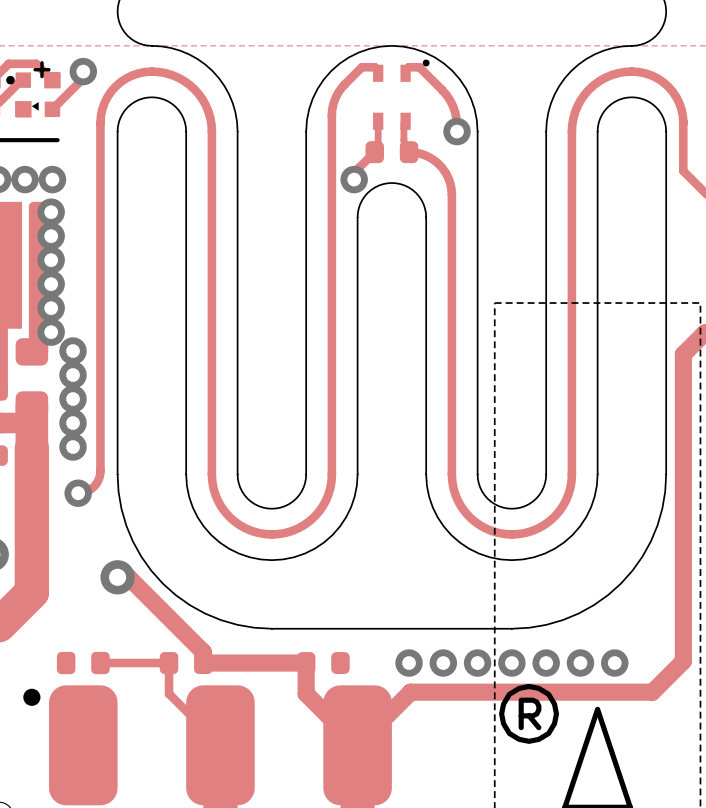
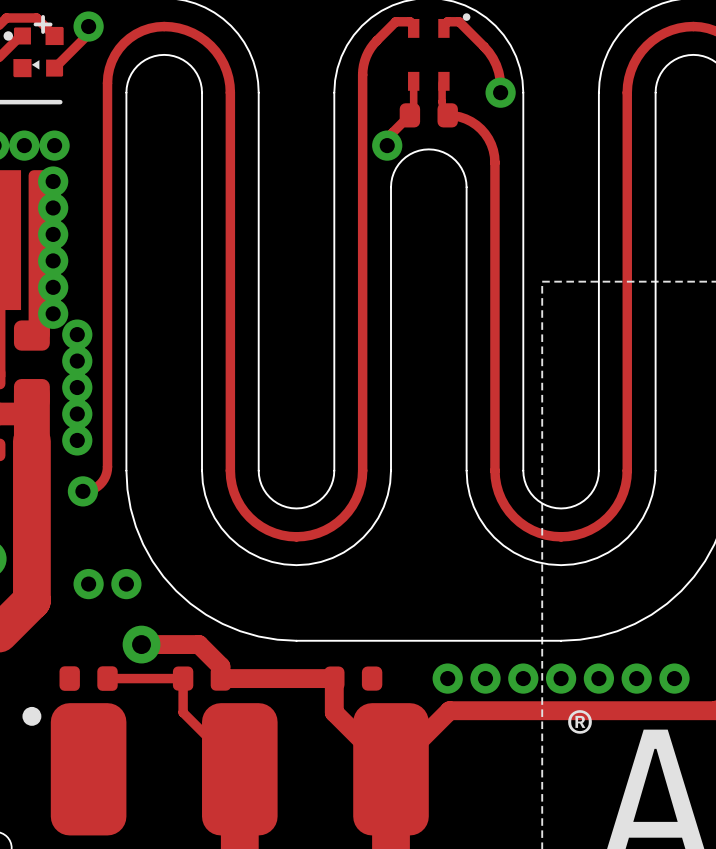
via: none -> (88, 584)
track: (117, 577) (128, 577) (183, 632) -> (141, 644) (198, 644)
via position: (117, 577) -> (141, 644)
via: none -> (126, 584)

